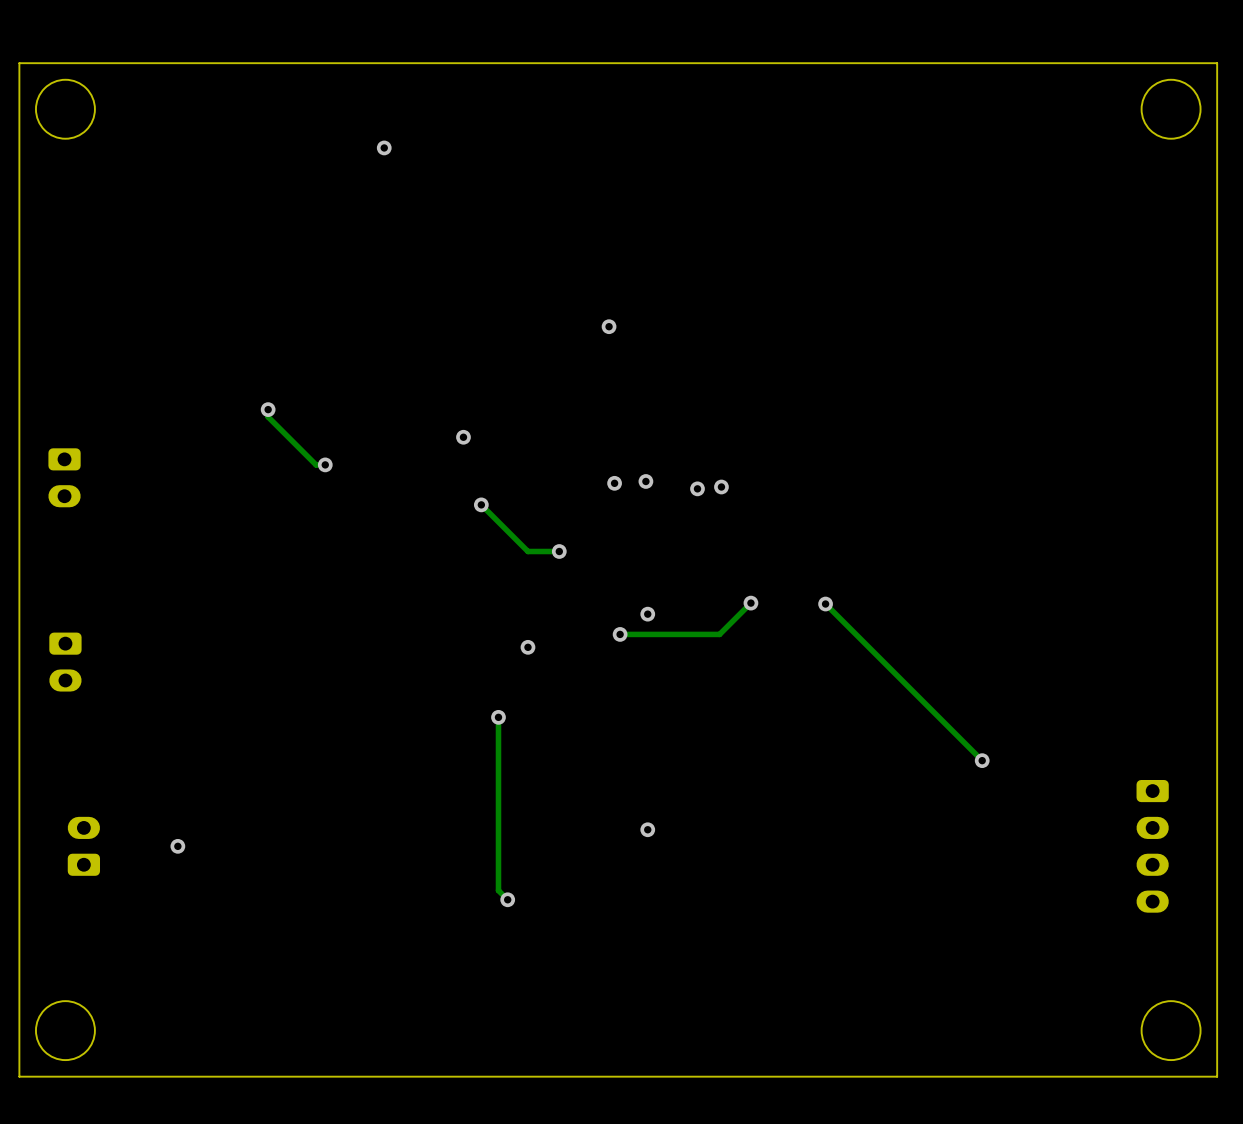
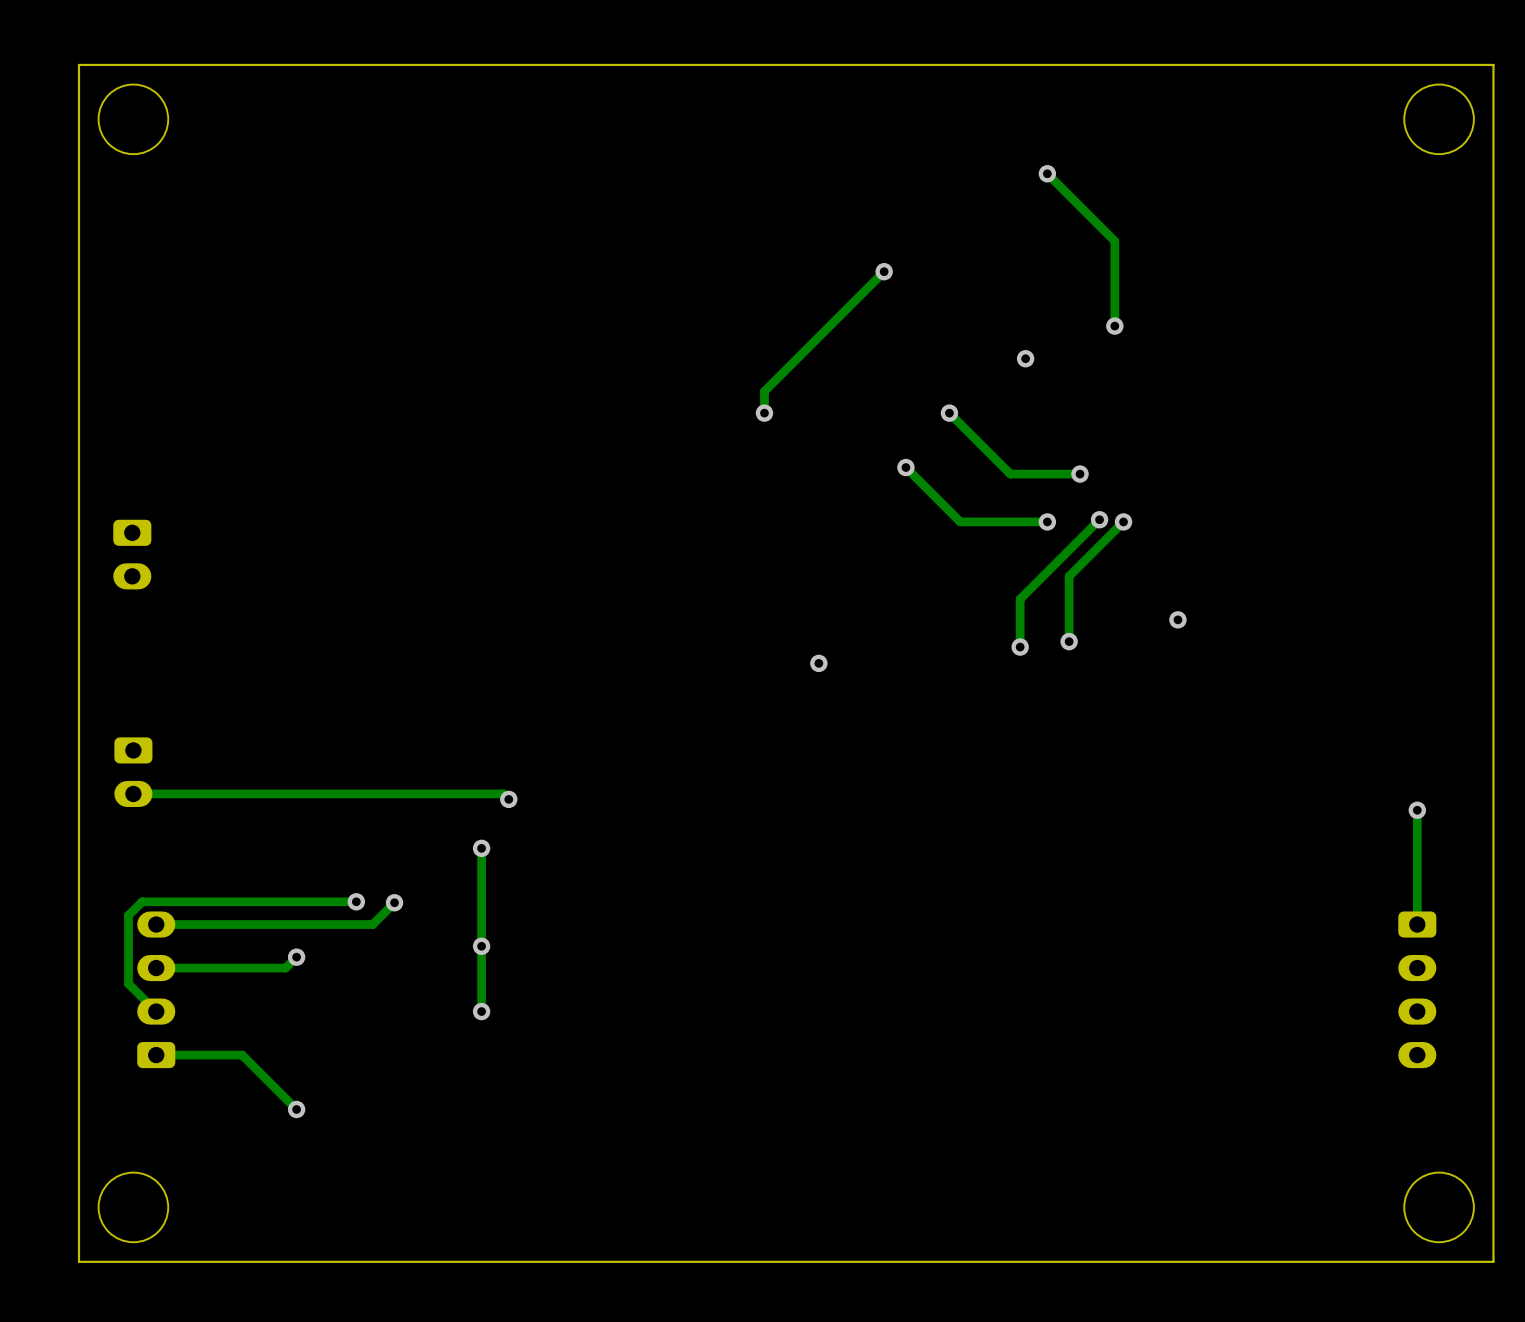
via: (384, 147) -> none
track: none -> (1047, 173) (1114, 241) (1114, 326)
via: none -> (1047, 173)
track: none -> (884, 271) (764, 391) (764, 413)
via: none -> (884, 271)
via: none -> (1114, 326)
via: none -> (1025, 358)
via position: (609, 326) -> (764, 413)
track: none -> (949, 413) (1010, 474) (1080, 474)
via: none -> (949, 413)
track: none -> (905, 467) (960, 521) (1047, 521)
via: none -> (905, 467)
track: (268, 409) (268, 416) (316, 464) (325, 464) -> none
via: (268, 409) -> none
via: none -> (1080, 474)
via: (463, 437) -> none
track: none -> (1099, 519) (1020, 599) (1020, 647)
via: none -> (1099, 519)
via: none -> (1047, 521)
track: none -> (1123, 521) (1069, 576) (1069, 641)
via: none -> (1123, 521)
via: (325, 464) -> none
via: (645, 481) -> none
via: (614, 483) -> none
via: (721, 487) -> none
via: (697, 488) -> none
track: (481, 504) (527, 551) (559, 551) -> none
via: (481, 504) -> none
via: none -> (1177, 619)
via: (559, 551) -> none
via: none -> (1069, 641)
via: none -> (1020, 647)
via: none -> (818, 663)
track: (750, 603) (719, 634) (620, 634) -> none
via: (750, 603) -> none
track: (825, 604) (982, 760) -> none
via: (825, 604) -> none
via: (647, 614) -> none
via: (620, 634) -> none
via: (527, 647) -> none
track: none -> (133, 793) (503, 793) (508, 799)
via: none -> (508, 799)
track: none -> (1417, 810) (1417, 924)
via: none -> (1417, 810)
track: (498, 717) (498, 890) (507, 899) -> none
via: (498, 717) -> none
track: none -> (481, 848) (481, 1011)
via: none -> (481, 848)
via: (982, 760) -> none
track: none -> (356, 901) (142, 901) (128, 915) (128, 983) (156, 1011)
via: none -> (356, 901)
track: none -> (394, 902) (372, 924) (156, 924)
via: none -> (394, 902)
via: none -> (481, 946)
part footprint: [67, 816, 101, 876] -> [137, 911, 176, 1069]
track: none -> (296, 957) (285, 968) (156, 968)
via: (647, 829) -> none
via position: (177, 846) -> (296, 957)
via: none -> (481, 1011)
via: (507, 899) -> none
track: none -> (156, 1055) (242, 1055) (296, 1109)
via: none -> (296, 1109)

